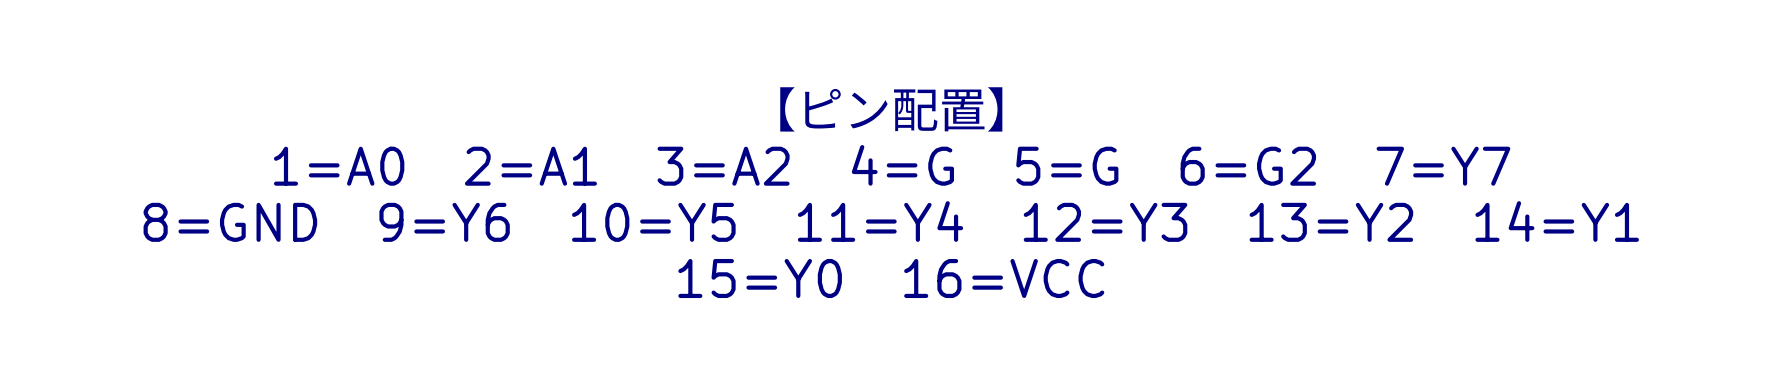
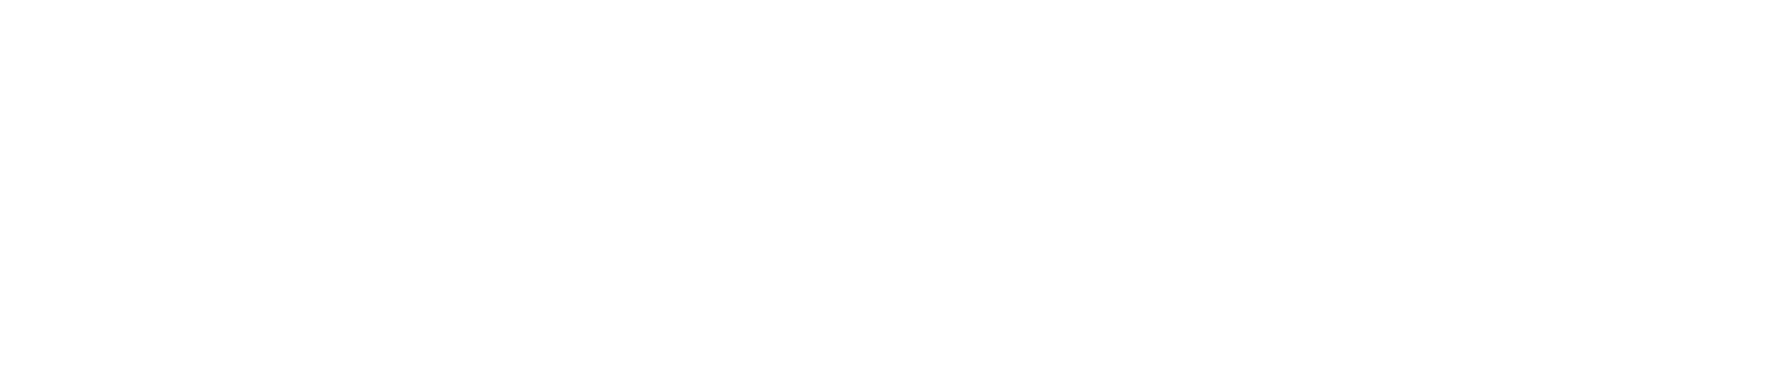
text: 【ピン配置】 (891, 109) -> none
text: 1=A0 2=A1 3=A2 4=G 5=G 6=G2 7=Y7 (892, 165) -> none
text: 8=GND 9=Y6 10=Y5 11=Y4 12=Y3 13=Y2 14=Y1 (891, 221) -> none
text: 15=Y0 16=VCC (891, 278) -> none

